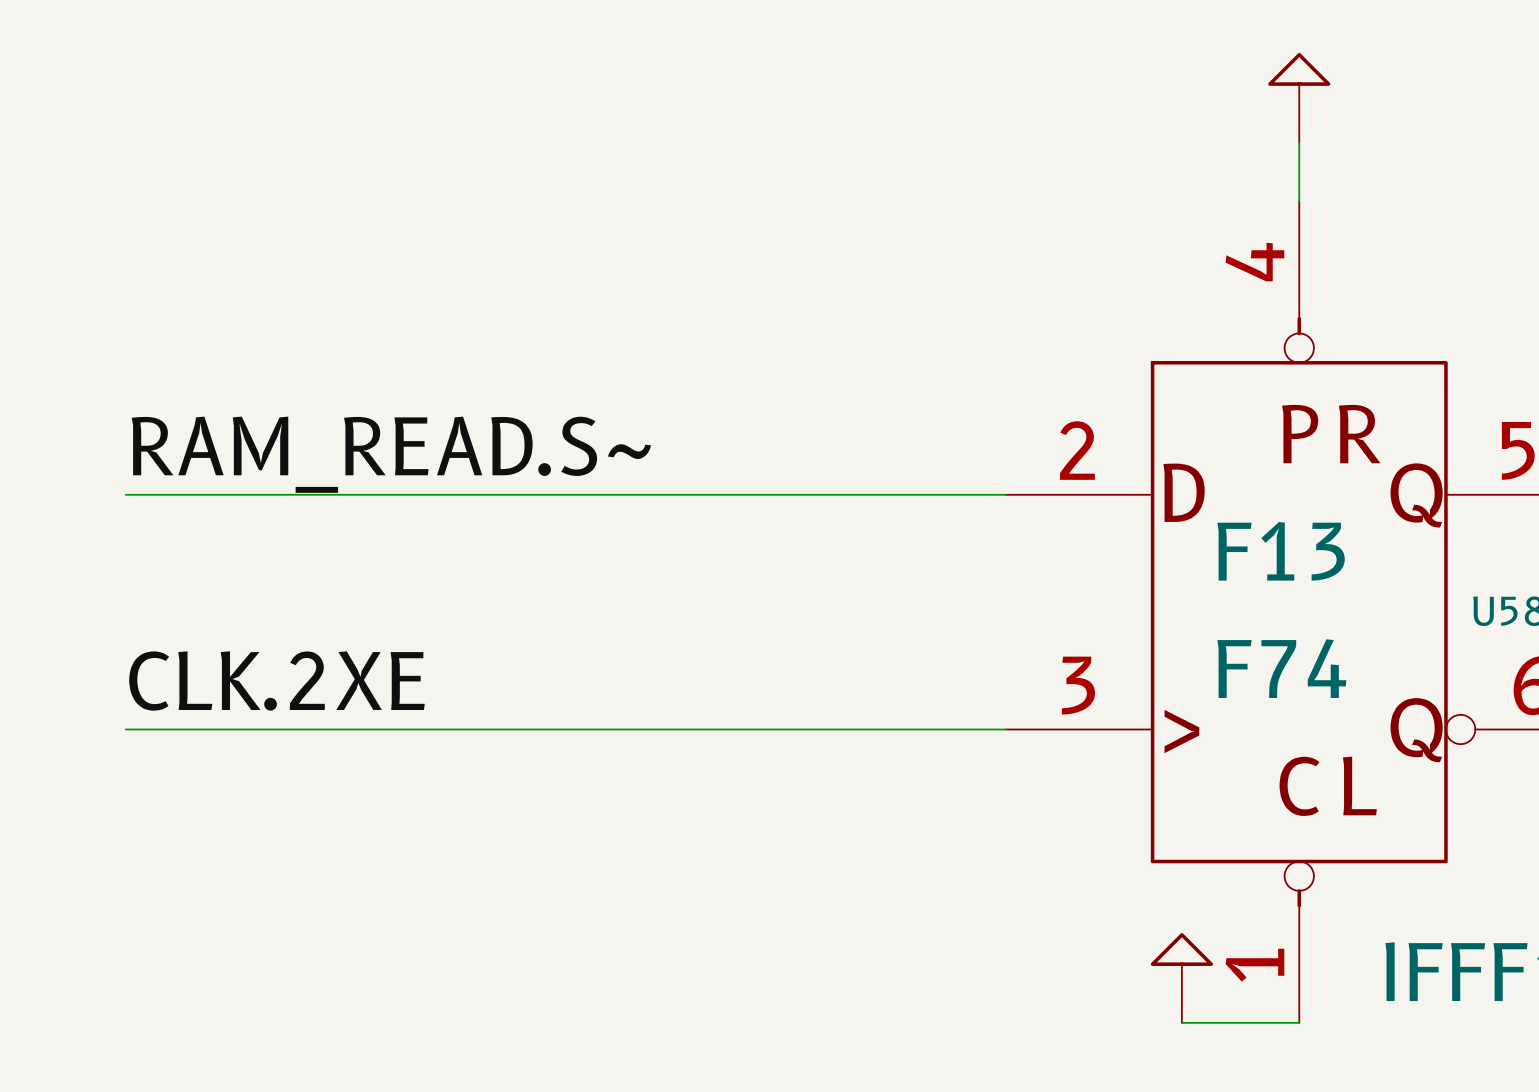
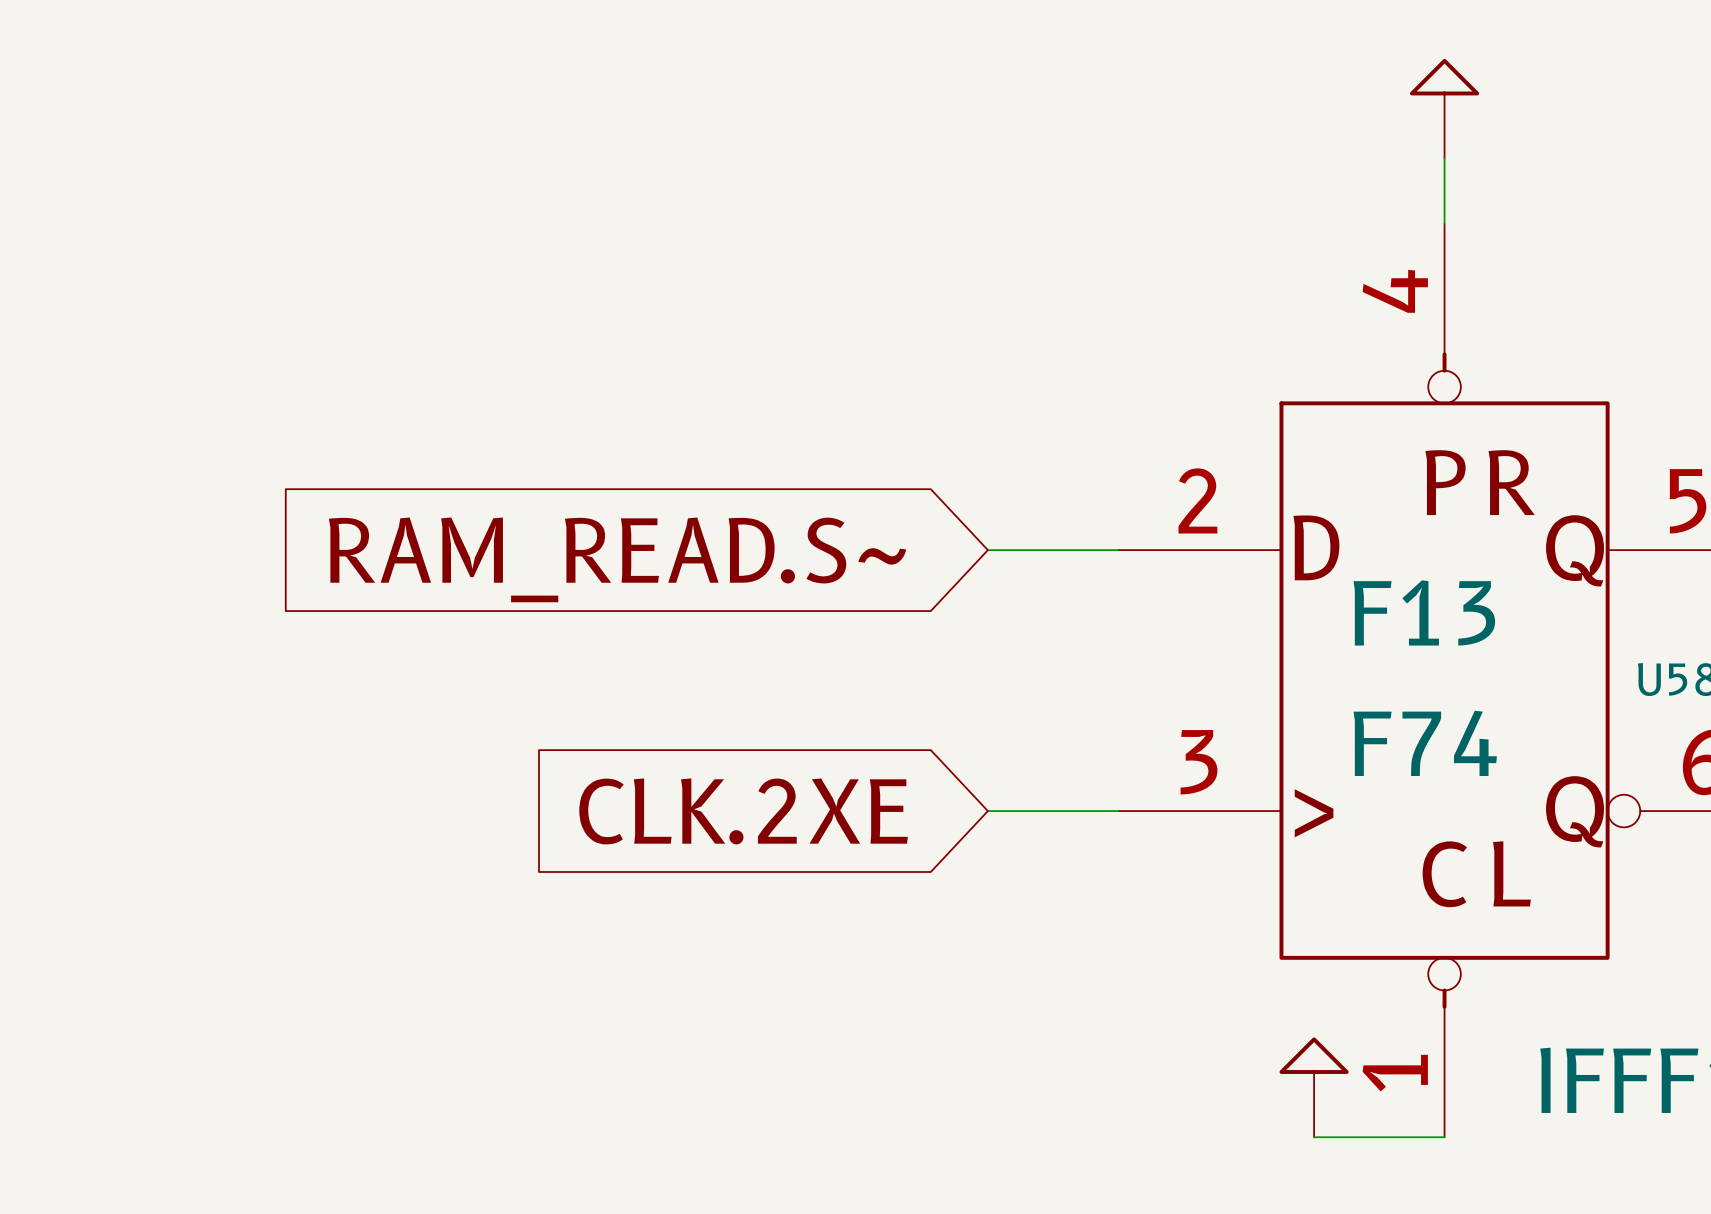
label: RAM_READ.S~ (391, 454) -> none
wire: (125, 494) (888, 494) -> none
global label: none -> RAM_READ.S~ (617, 559)
label: CLK.2XE (276, 680) -> none
wire: (125, 729) (888, 729) -> none
global label: none -> CLK.2XE (743, 811)

